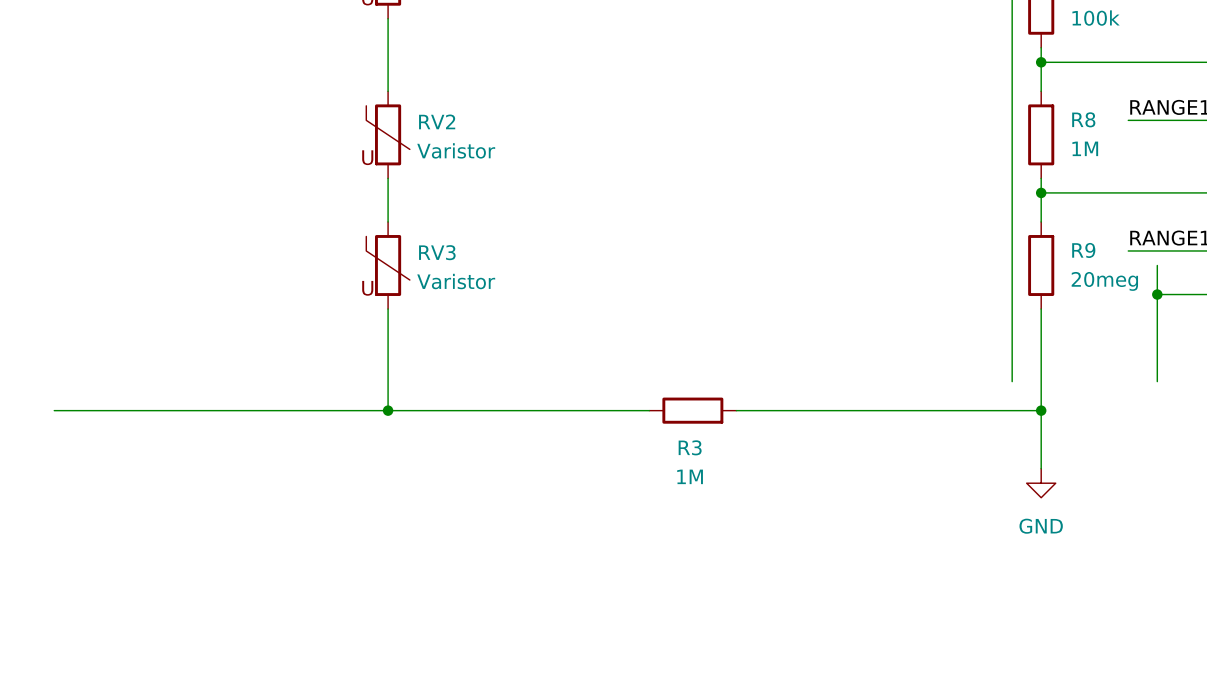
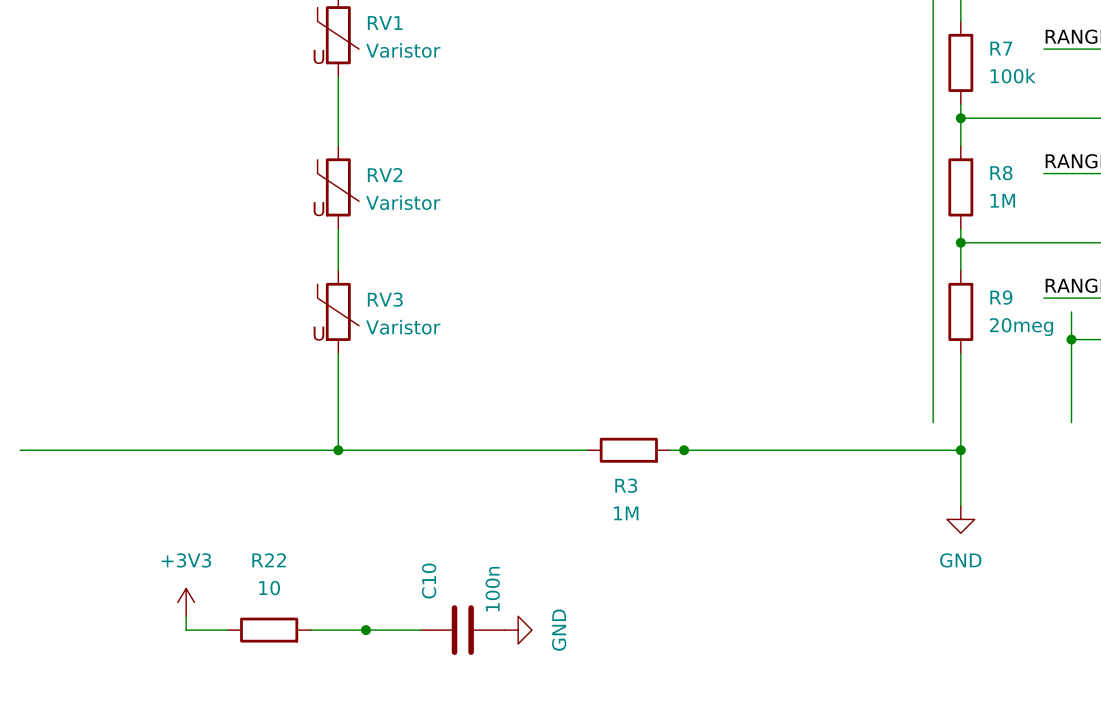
junction: none -> (684, 450)
power symbol: none -> +3V3 (186, 602)
wire: none -> (186, 616) (186, 630) (227, 630)
R22: none -> 10 (269, 630)
wire: none -> (310, 630) (421, 630)
junction: none -> (365, 630)
C10: none -> 100n (462, 630)
power symbol: none -> GND (518, 630)

